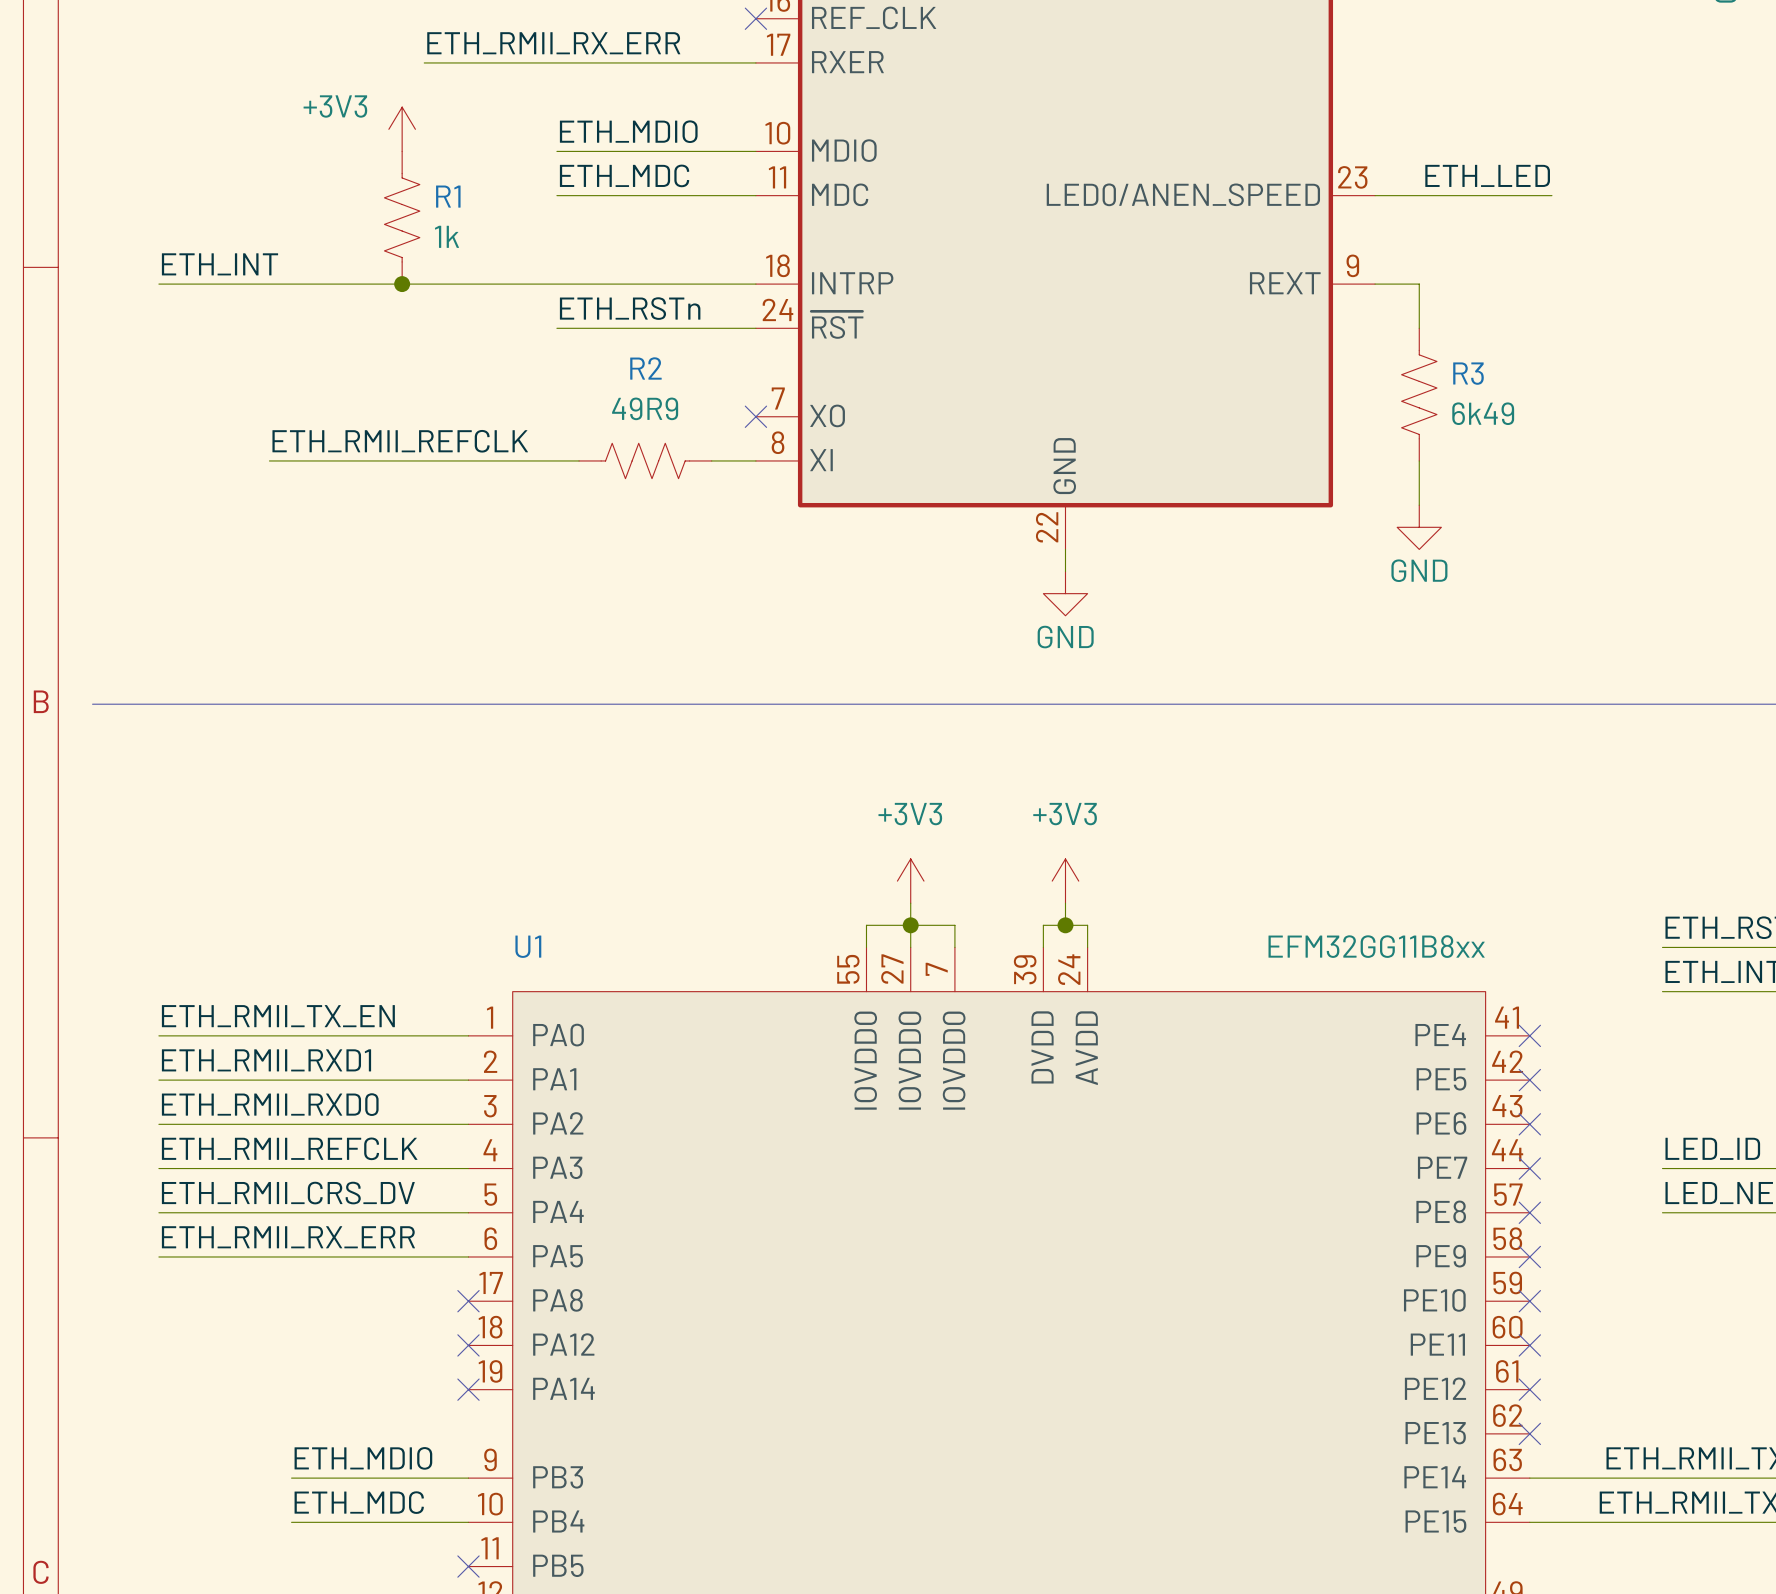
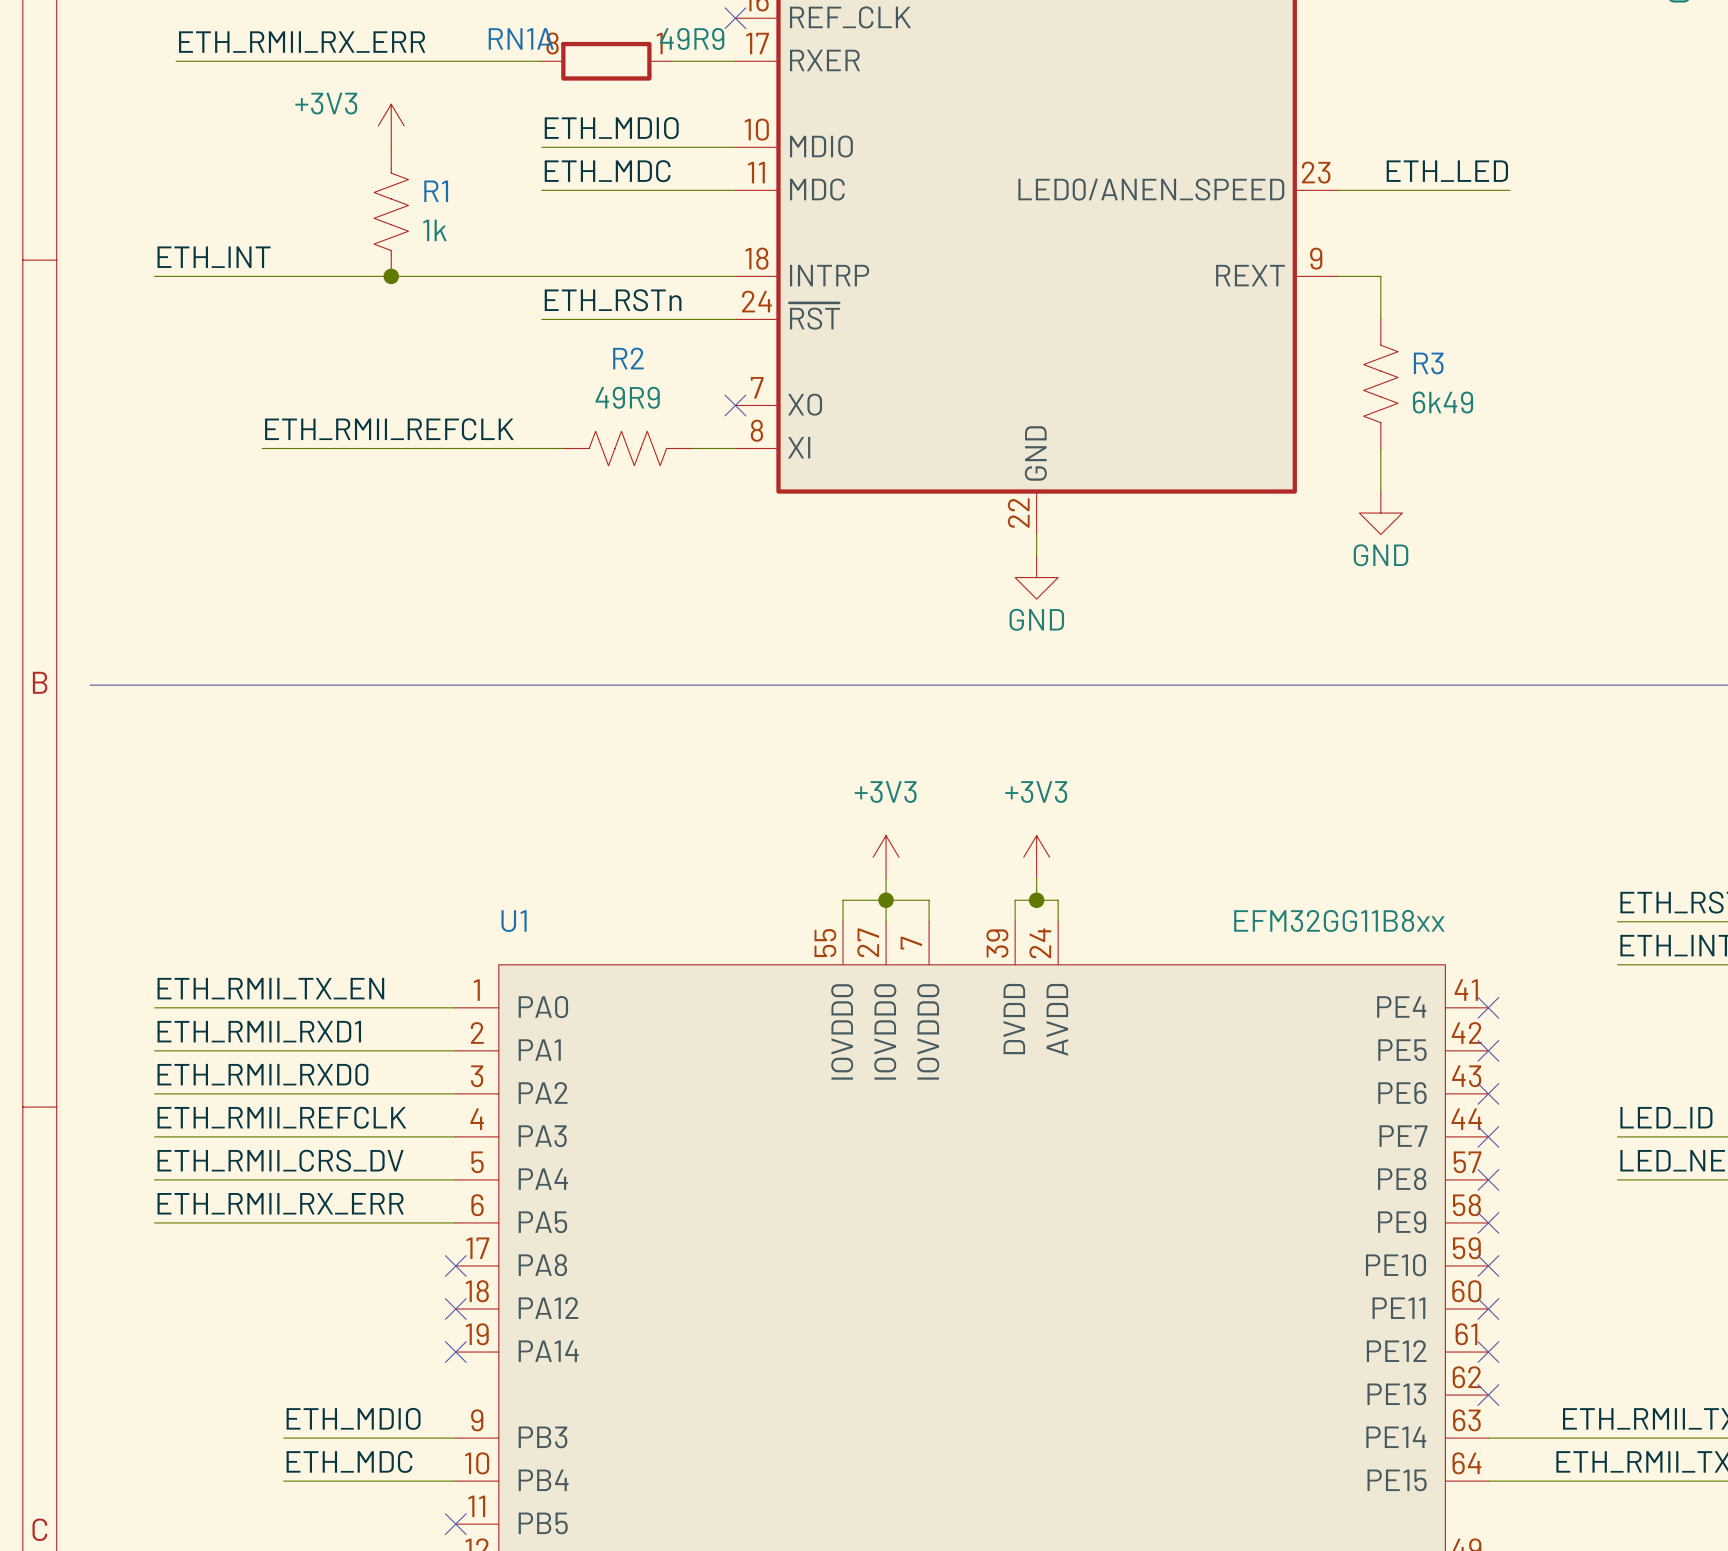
label position: ETH_RMII_RX_ERR (553, 43) -> ETH_RMII_RX_ERR (302, 42)
wire: none -> (176, 61) (412, 61)
wire: (556, 62) (689, 62) -> none
RN1A: none -> 49R9 (606, 61)

